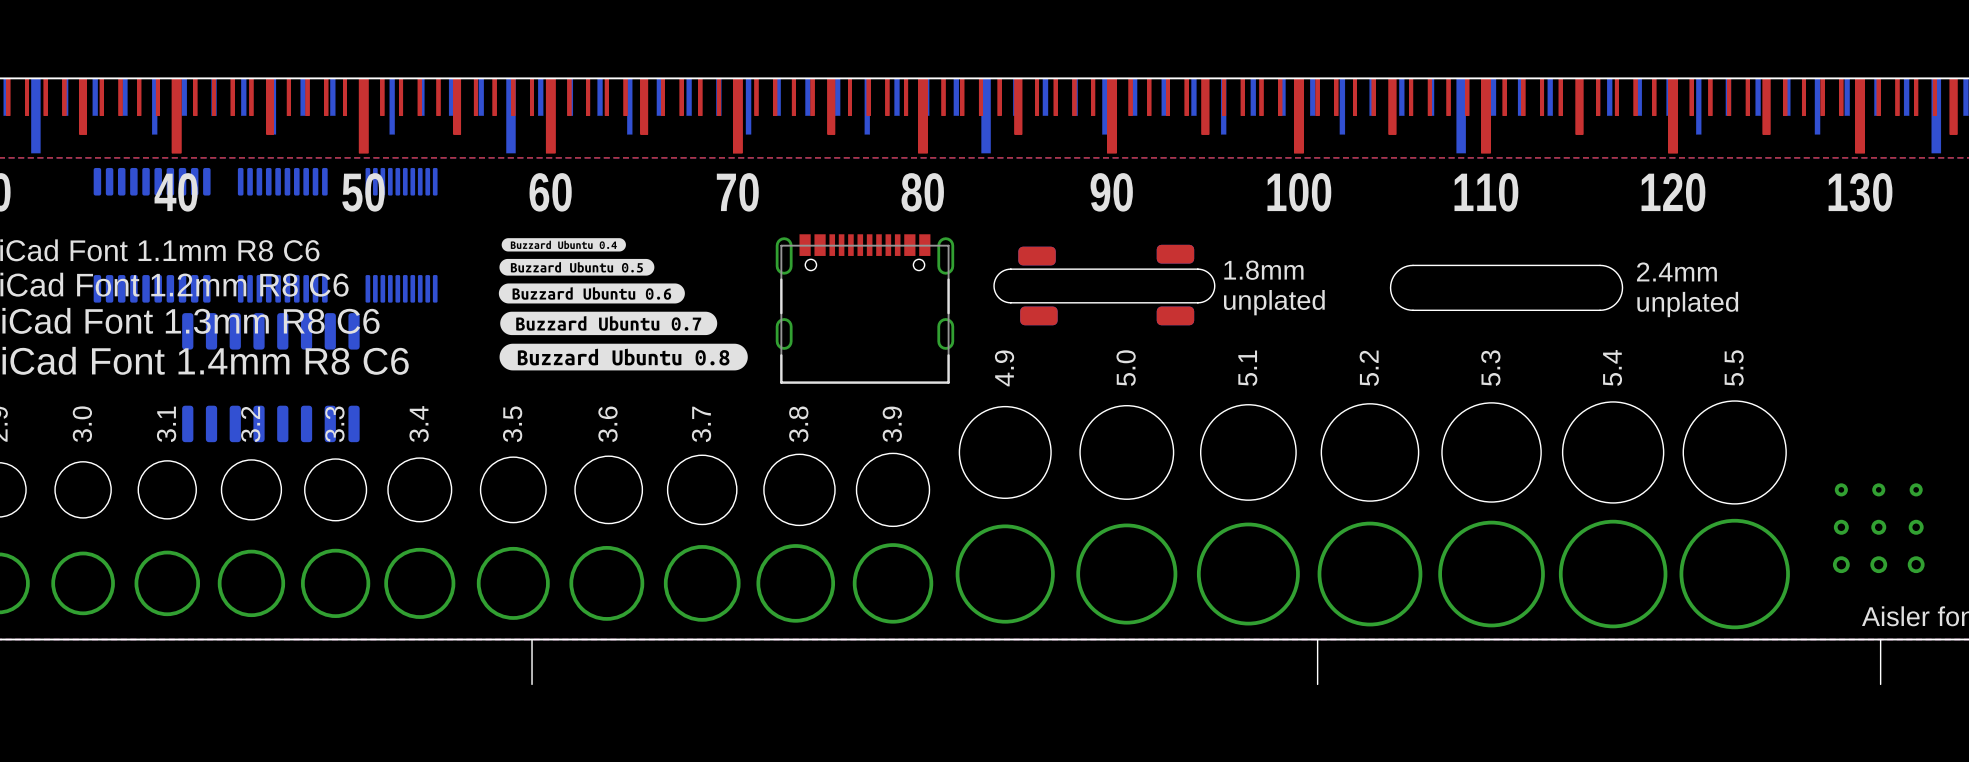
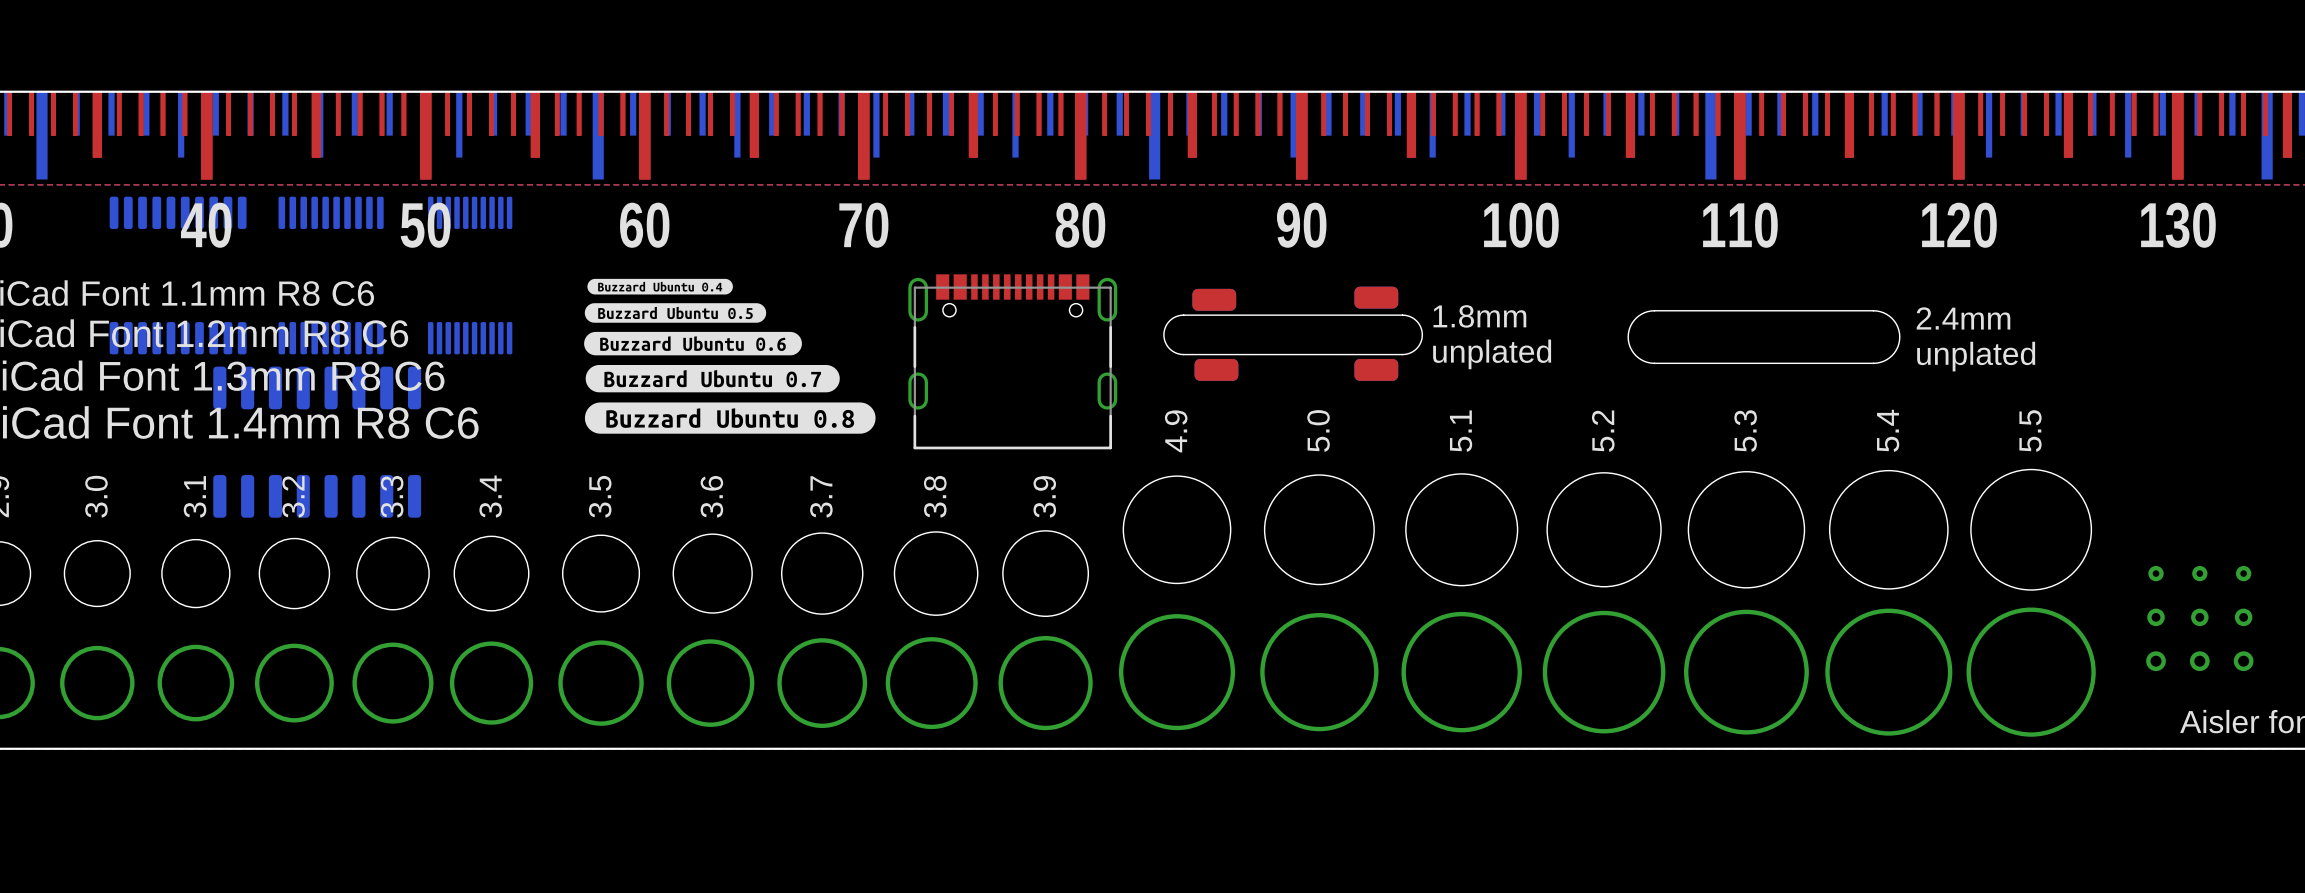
board edge: (532, 639) (532, 684) -> none
board edge: (1317, 639) (1317, 684) -> none
board edge: (1880, 639) (1880, 684) -> none

